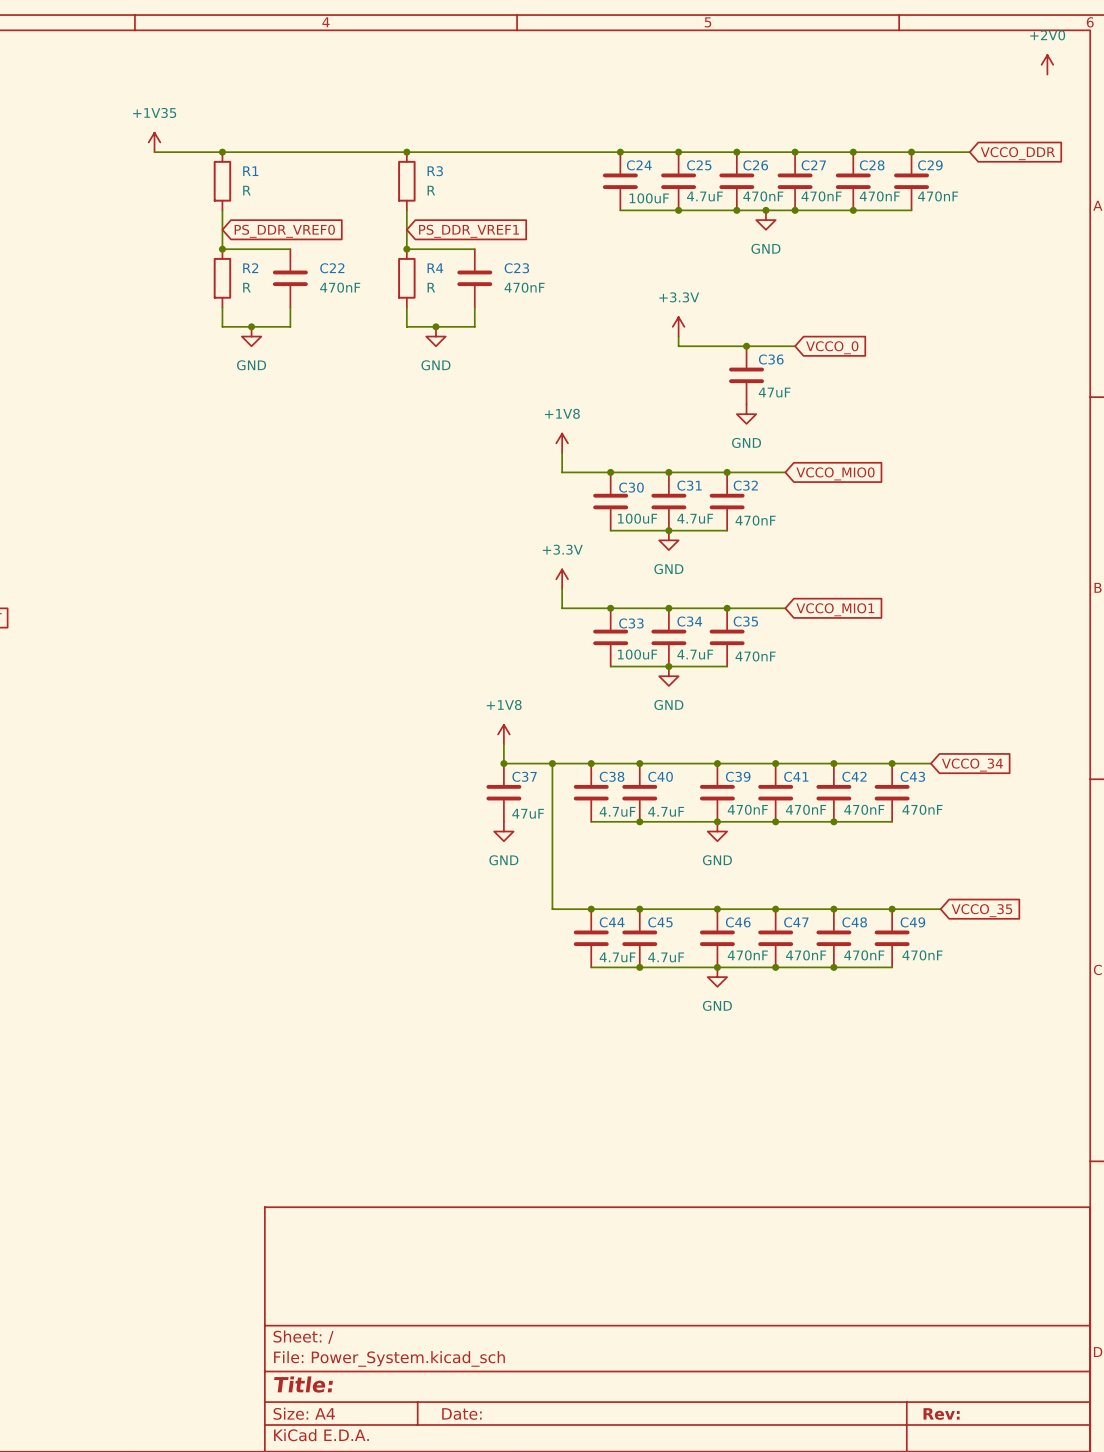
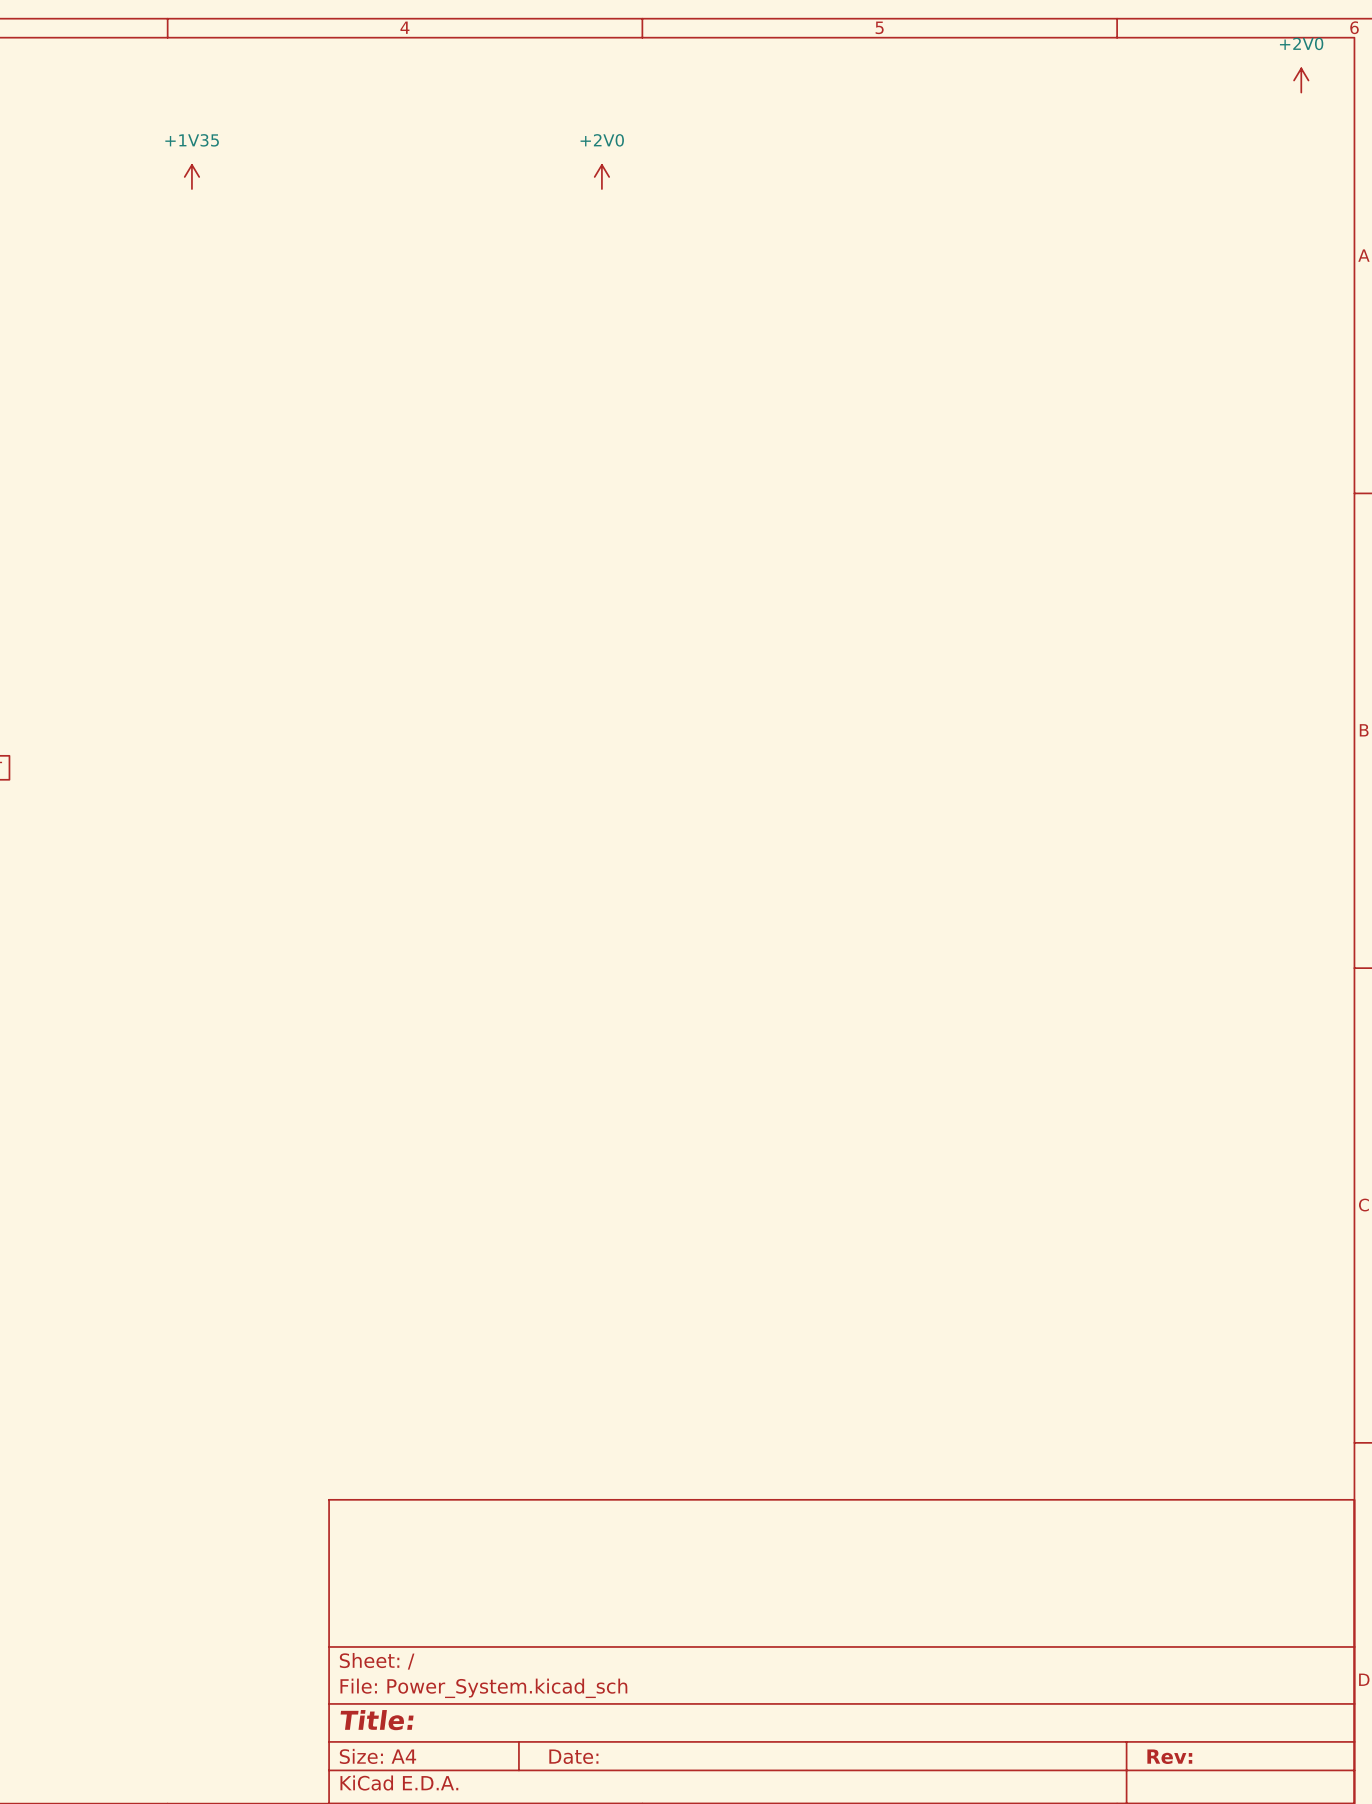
power symbol: none -> +2V0 (601, 176)
wire: (154, 152) (969, 152) -> none
junction: (222, 152) -> none
junction: (406, 152) -> none
junction: (620, 152) -> none
junction: (678, 152) -> none
junction: (736, 152) -> none
junction: (795, 152) -> none
junction: (853, 152) -> none
junction: (911, 152) -> none
global label: VCCO_DDR (1017, 153) -> none
R1: R (222, 181) -> none
R3: R (406, 181) -> none
C24: 100uF (620, 181) -> none
C25: 4.7uF (678, 181) -> none
C26: 470nF (736, 181) -> none
C27: 470nF (795, 181) -> none
C28: 470nF (853, 181) -> none
C29: 470nF (911, 181) -> none
wire: (222, 210) (222, 249) (290, 249) -> none
wire: (406, 210) (406, 249) (474, 249) -> none
wire: (620, 210) (911, 210) -> none
junction: (678, 210) -> none
junction: (736, 210) -> none
junction: (765, 210) -> none
junction: (795, 210) -> none
junction: (853, 210) -> none
power symbol: GND (765, 220) -> none
global label: PS_DDR_VREF0 (284, 231) -> none
global label: PS_DDR_VREF1 (469, 231) -> none
junction: (222, 249) -> none
junction: (406, 249) -> none
R2: R (222, 278) -> none
C22: 470nF (290, 278) -> none
R4: R (406, 278) -> none
C23: 470nF (474, 278) -> none
wire: (222, 307) (222, 326) (290, 326) (290, 307) -> none
wire: (406, 307) (406, 326) (474, 326) (474, 307) -> none
junction: (251, 326) -> none
junction: (435, 326) -> none
power symbol: +3.3V (678, 326) -> none
power symbol: GND (251, 336) -> none
power symbol: GND (435, 336) -> none
wire: (678, 336) (678, 346) (795, 346) -> none
junction: (746, 346) -> none
global label: VCCO_0 (832, 347) -> none
C36: 47uF (746, 375) -> none
power symbol: GND (746, 414) -> none
power symbol: +1V8 (562, 443) -> none
wire: (562, 453) (562, 472) (785, 472) -> none
junction: (610, 472) -> none
junction: (668, 472) -> none
junction: (727, 472) -> none
global label: VCCO_MIO0 (835, 473) -> none
C30: 100uF (610, 501) -> none
C31: 4.7uF (668, 501) -> none
C32: 470nF (727, 501) -> none
wire: (610, 530) (727, 530) -> none
junction: (668, 530) -> none
power symbol: GND (668, 540) -> none
power symbol: +3.3V (562, 579) -> none
wire: (562, 588) (562, 608) (785, 608) -> none
junction: (610, 608) -> none
junction: (668, 608) -> none
junction: (727, 608) -> none
global label: VCCO_MIO1 (835, 609) -> none
C33: 100uF (610, 637) -> none
C34: 4.7uF (668, 637) -> none
C35: 470nF (727, 637) -> none
wire: (610, 666) (727, 666) -> none
junction: (668, 666) -> none
power symbol: GND (668, 676) -> none
power symbol: +1V8 (503, 734) -> none
wire: (503, 744) (503, 763) (930, 763) -> none
junction: (503, 763) -> none
wire: (552, 763) (552, 909) (940, 909) -> none
junction: (552, 763) -> none
junction: (591, 763) -> none
junction: (639, 763) -> none
junction: (717, 763) -> none
junction: (775, 763) -> none
junction: (833, 763) -> none
junction: (892, 763) -> none
global label: VCCO_34 (972, 765) -> none
C37: 47uF (503, 792) -> none
C38: 4.7uF (591, 792) -> none
C40: 4.7uF (639, 792) -> none
C39: 470nF (717, 792) -> none
C41: 470nF (775, 792) -> none
C42: 470nF (833, 792) -> none
C43: 470nF (892, 792) -> none
wire: (591, 821) (892, 821) -> none
junction: (639, 821) -> none
junction: (717, 821) -> none
junction: (775, 821) -> none
junction: (833, 821) -> none
power symbol: GND (503, 831) -> none
power symbol: GND (717, 831) -> none
junction: (591, 909) -> none
junction: (639, 909) -> none
junction: (717, 909) -> none
junction: (775, 909) -> none
junction: (833, 909) -> none
junction: (892, 909) -> none
global label: VCCO_35 (981, 910) -> none
C44: 4.7uF (591, 938) -> none
C45: 4.7uF (639, 938) -> none
C46: 470nF (717, 938) -> none
C47: 470nF (775, 938) -> none
C48: 470nF (833, 938) -> none
C49: 470nF (892, 938) -> none
wire: (591, 967) (892, 967) -> none
junction: (639, 967) -> none
junction: (717, 967) -> none
junction: (775, 967) -> none
junction: (833, 967) -> none
power symbol: GND (717, 977) -> none

